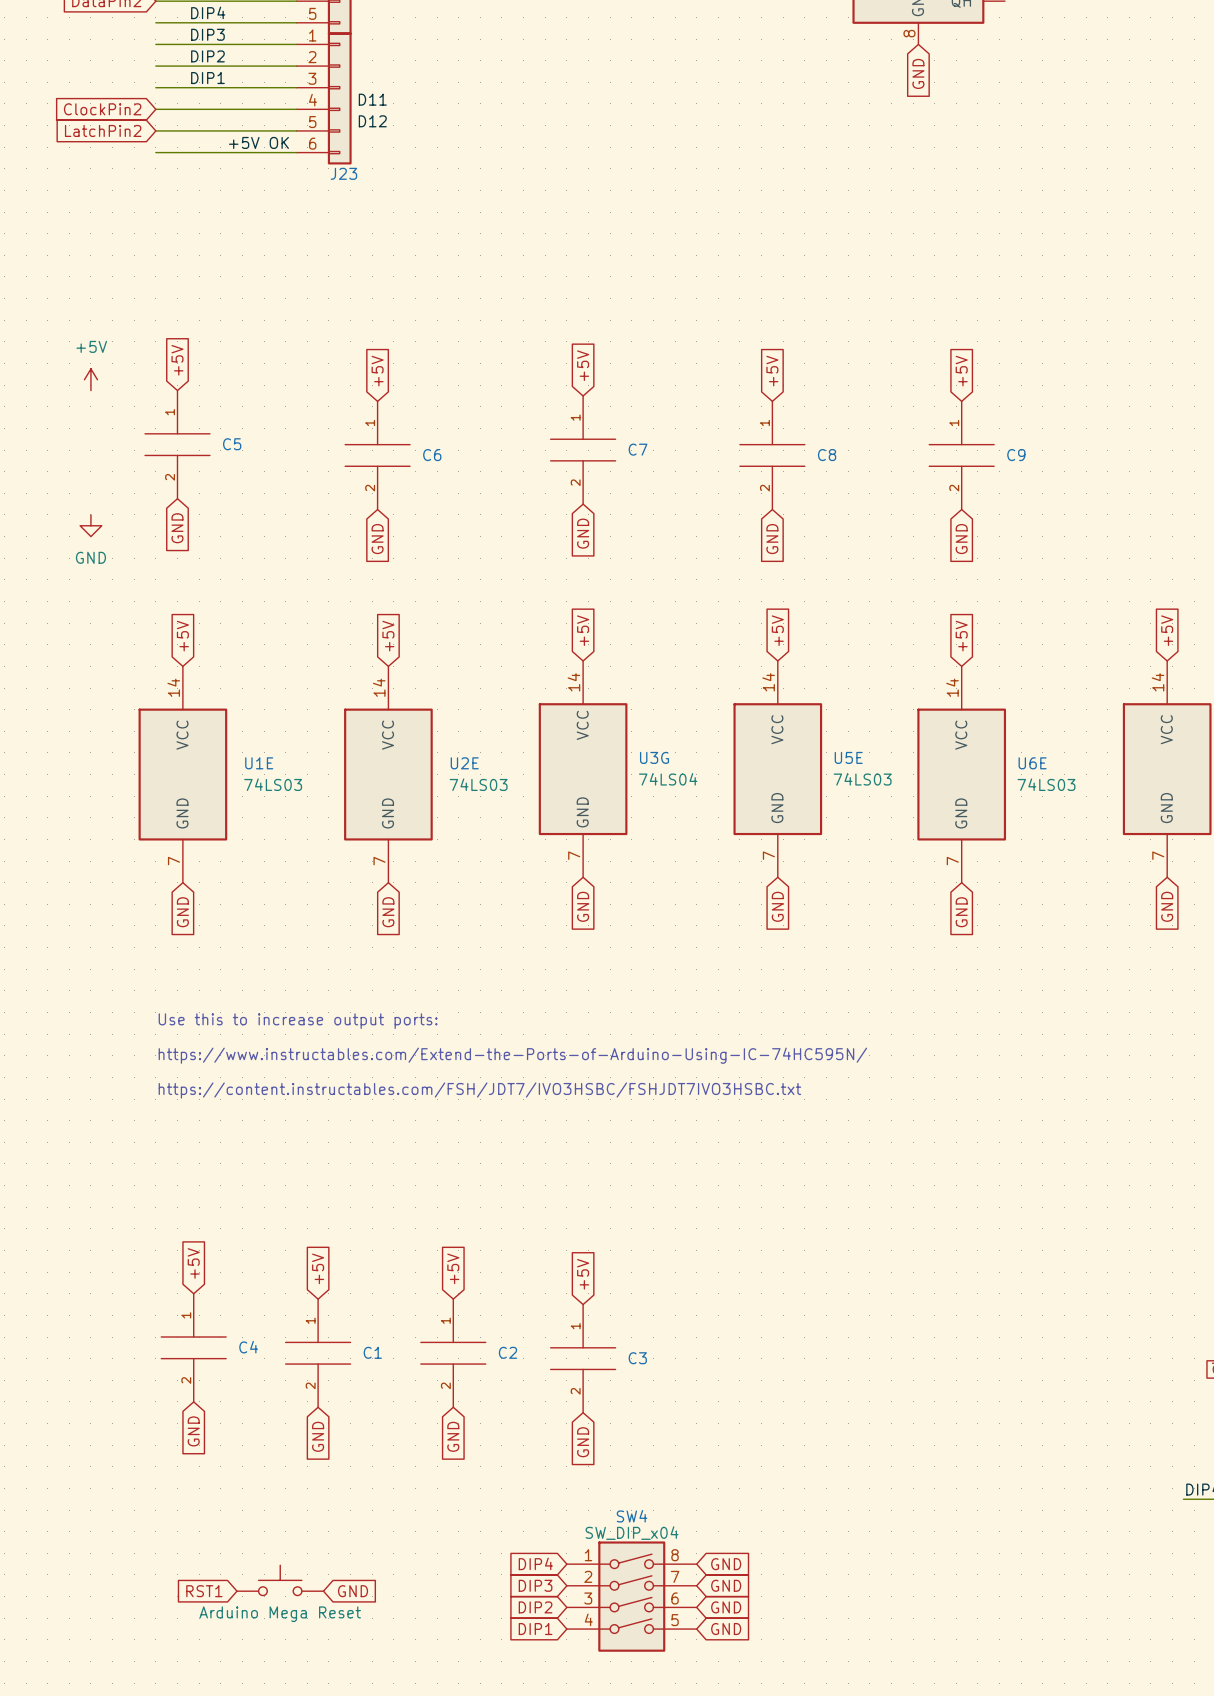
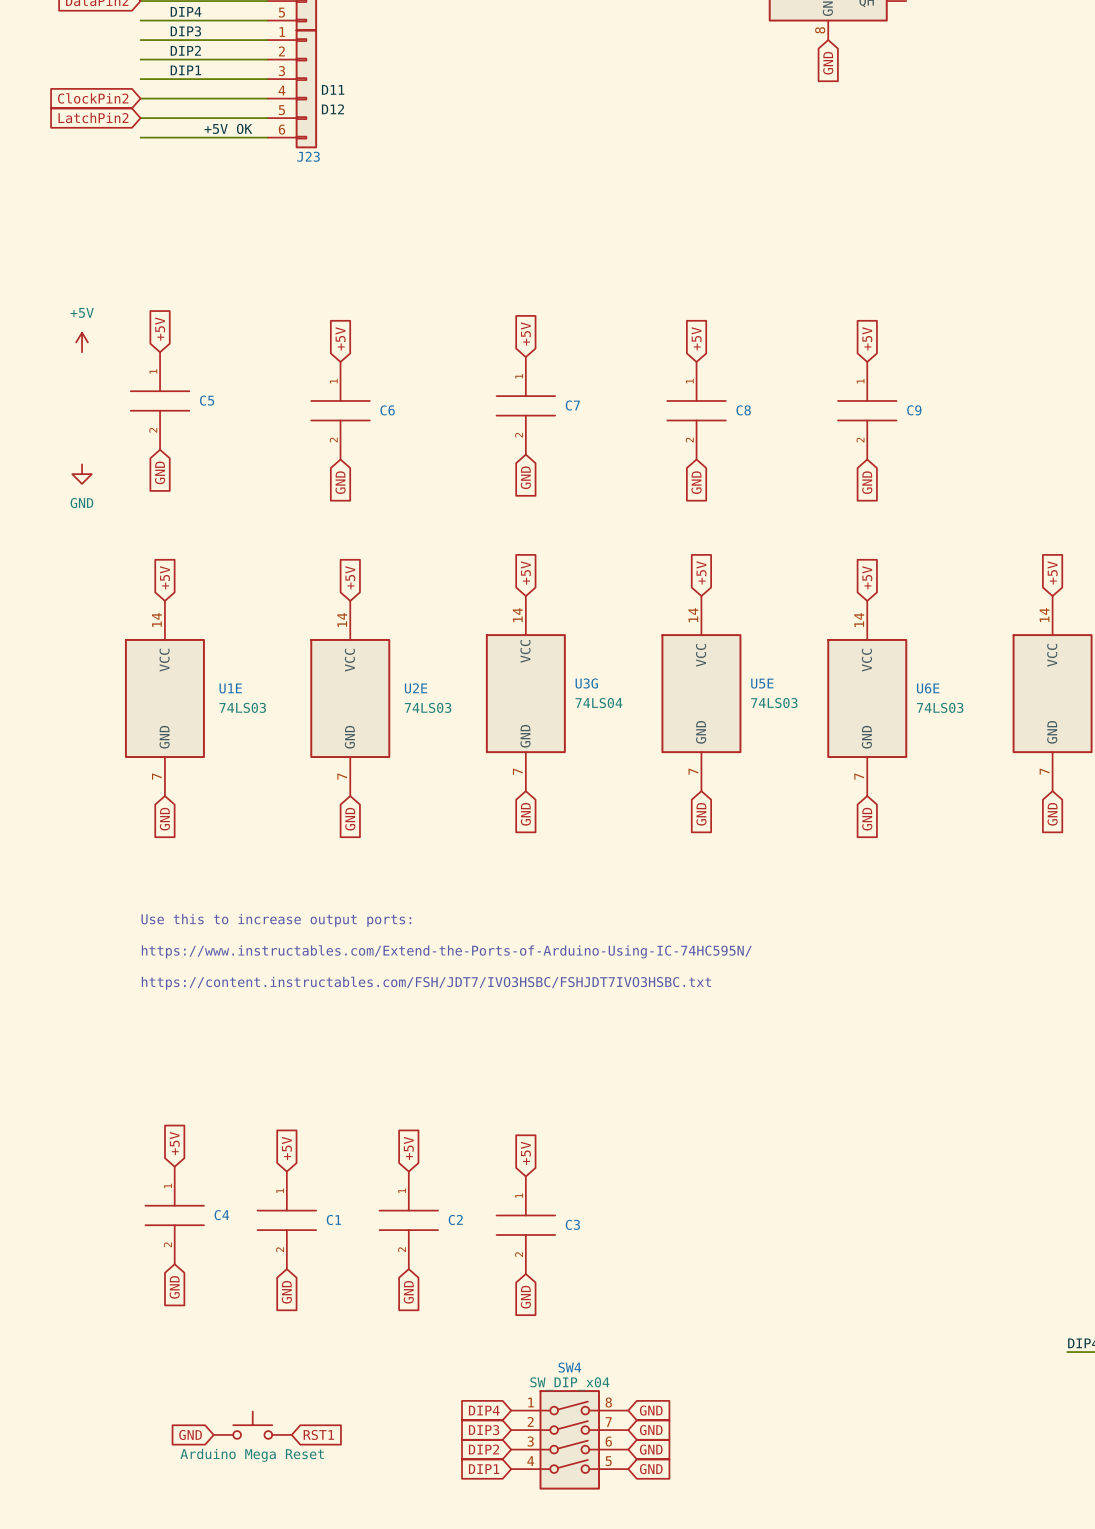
global label: RST1 (204, 1591) -> GND (190, 1434)
global label: GND (353, 1591) -> RST1 (318, 1434)

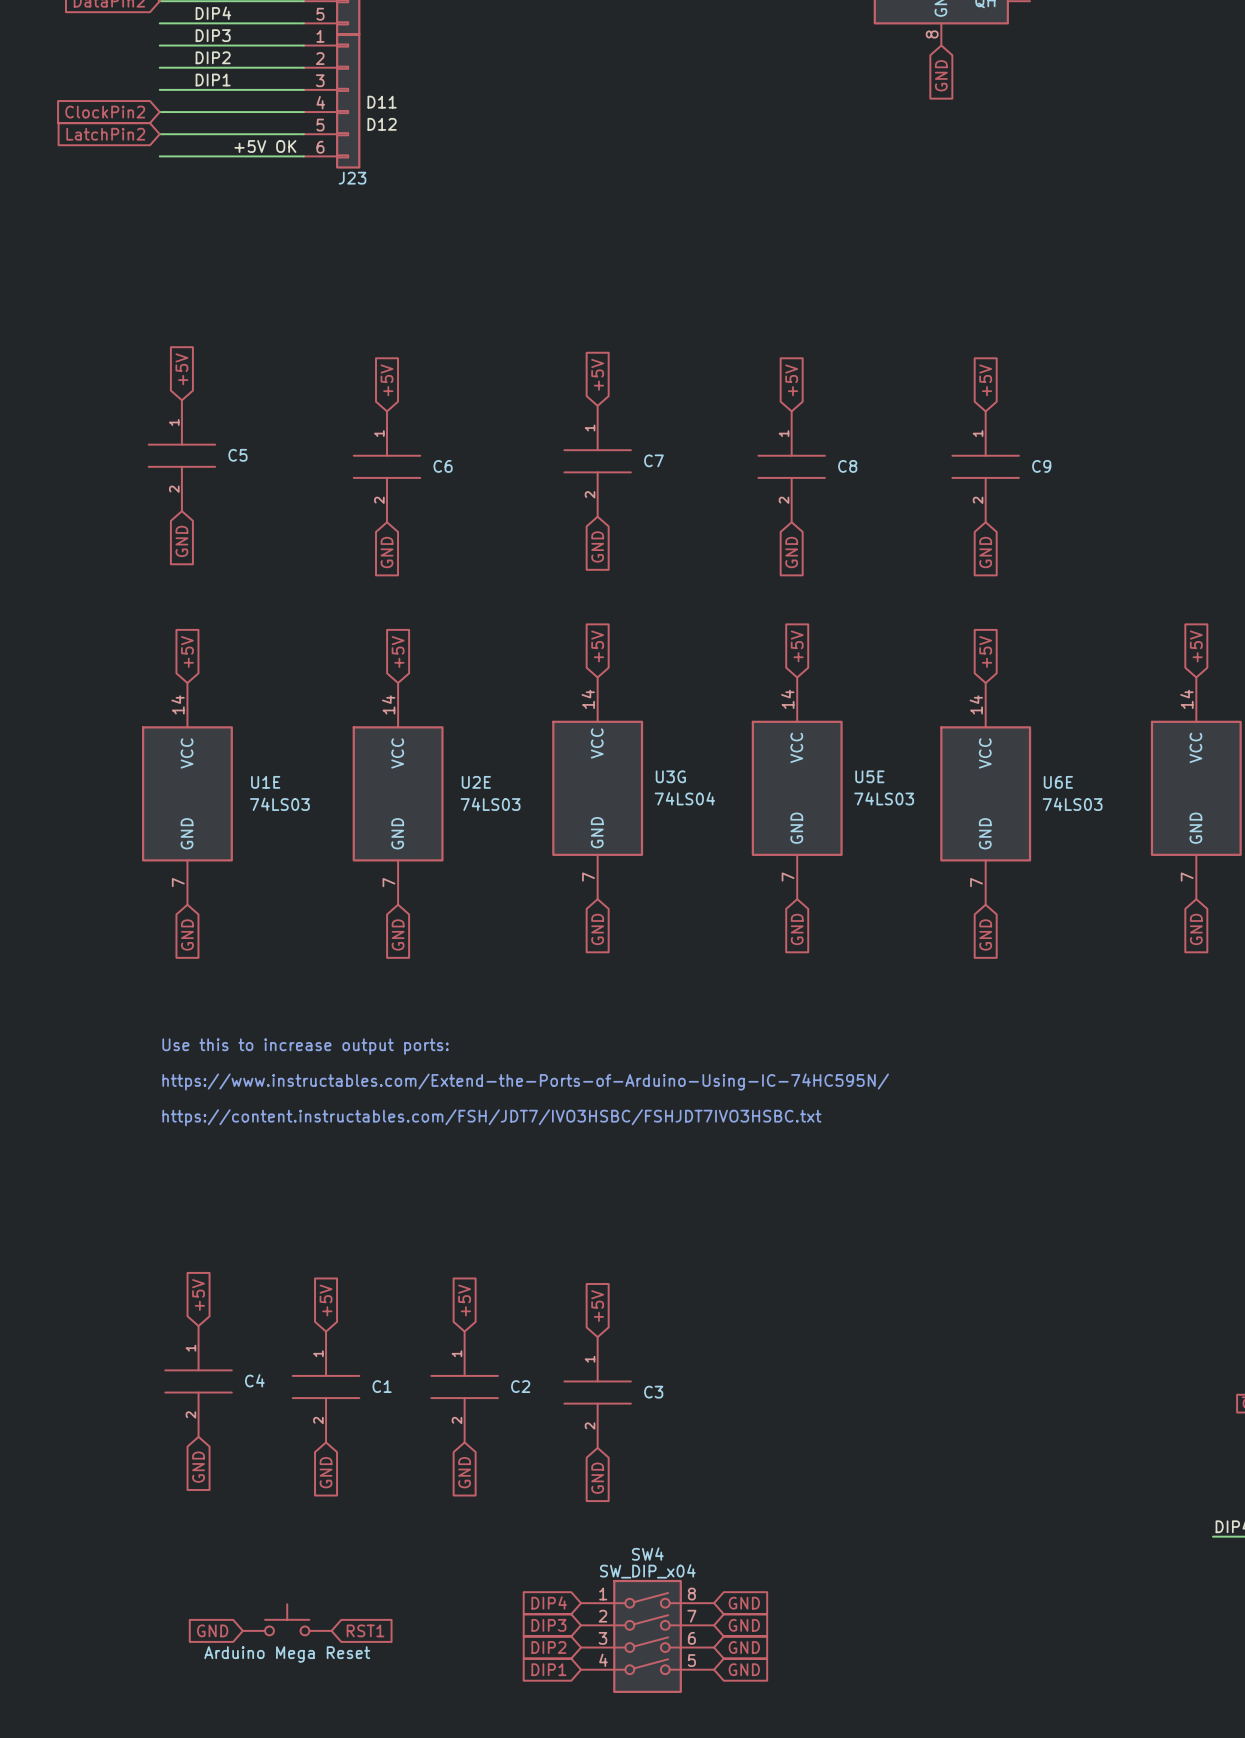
power symbol: +5V (82, 342) -> none
power symbol: GND (82, 474) -> none

